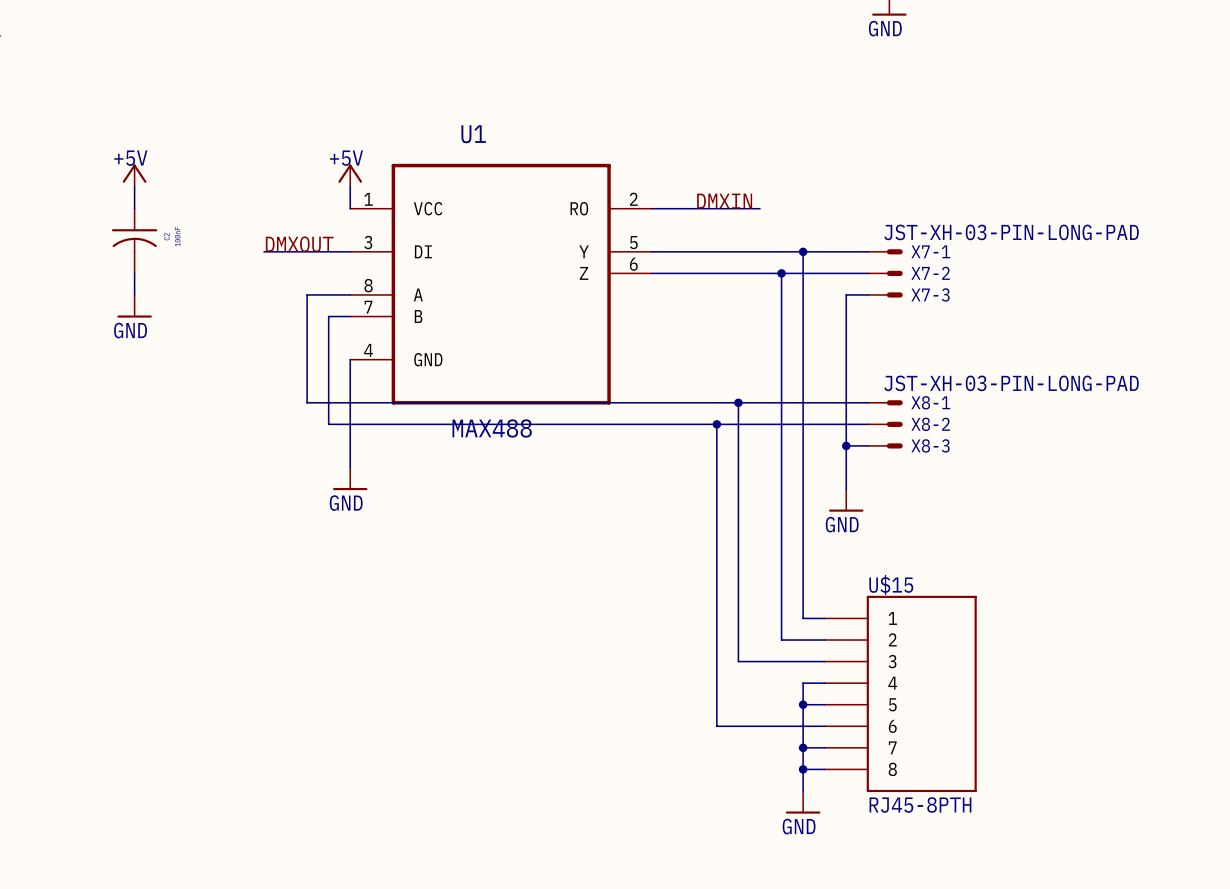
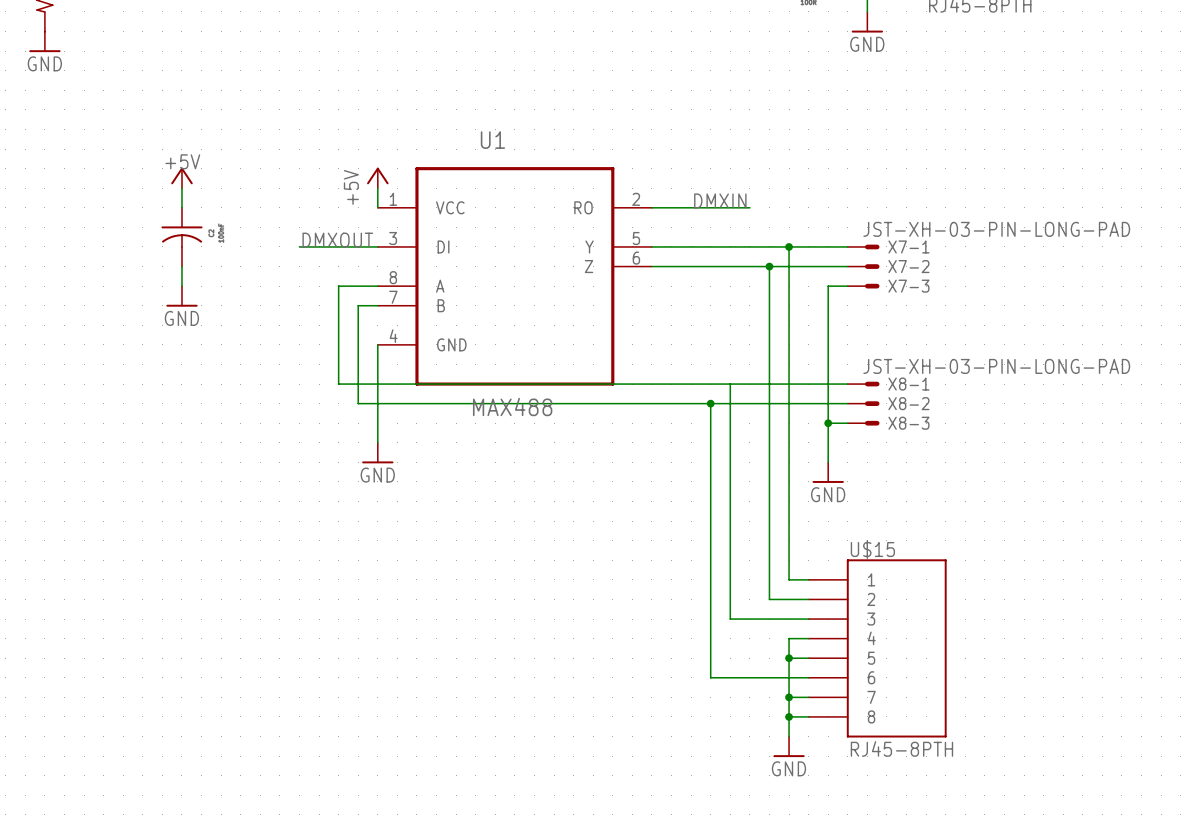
power symbol text rotation: 0° (346, 158) -> 90° counterclockwise (351, 187)
junction: (738, 402) -> none

